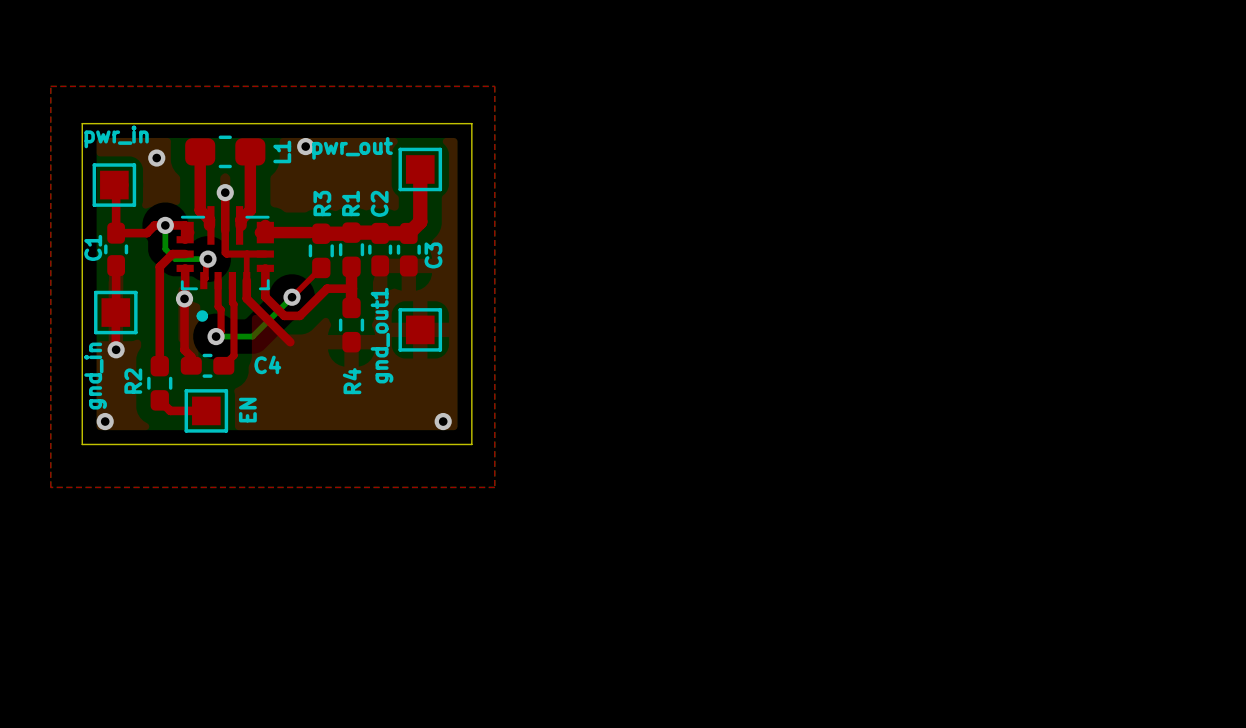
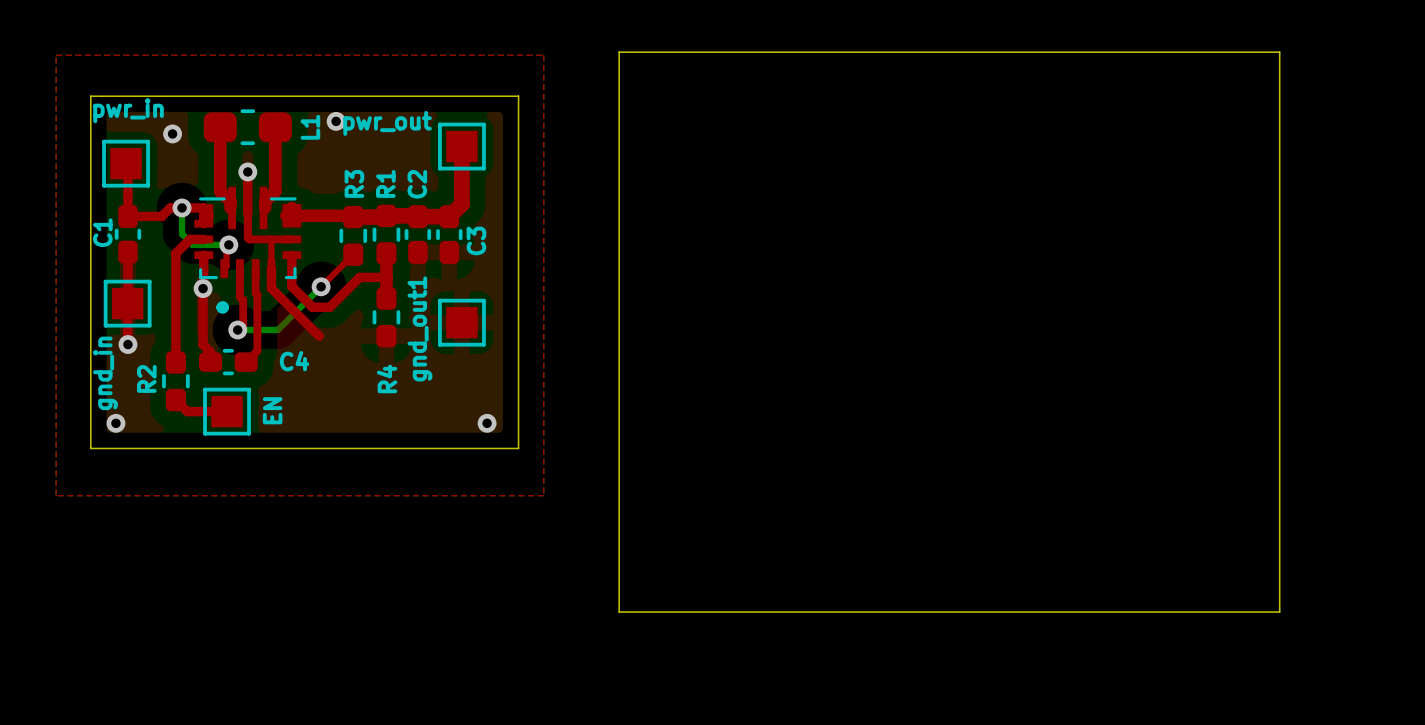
board edge: none -> (619, 52) (1279, 52) (1279, 612) (619, 612) (619, 52)

